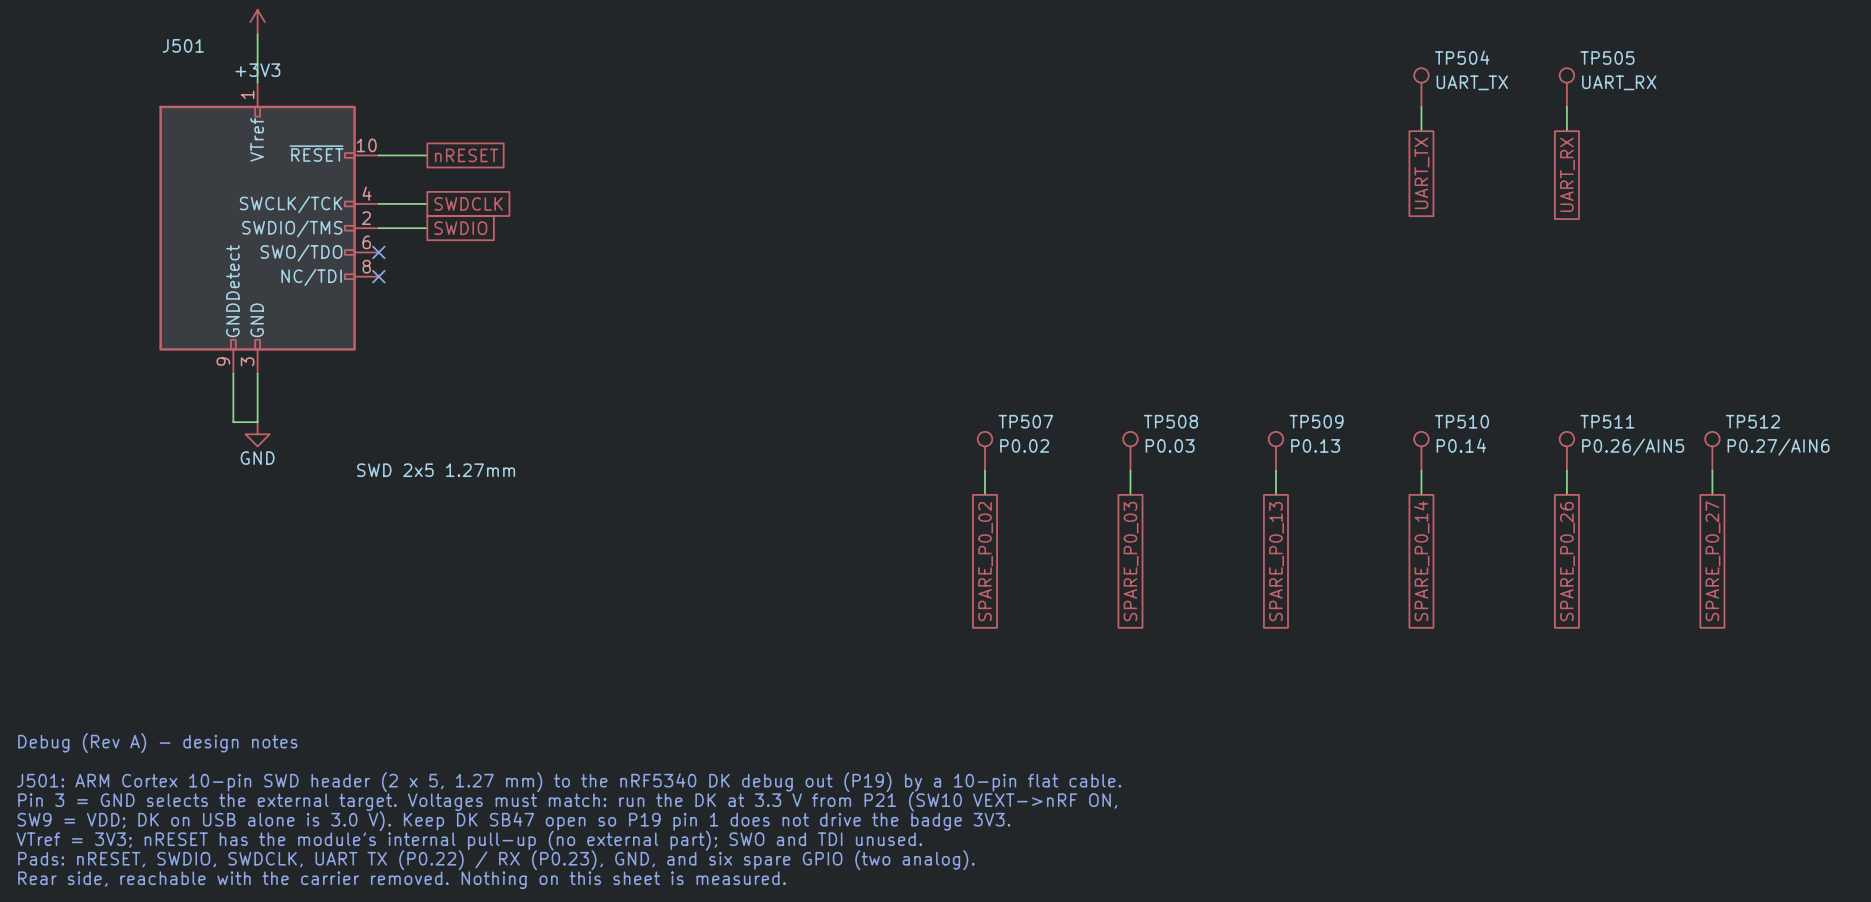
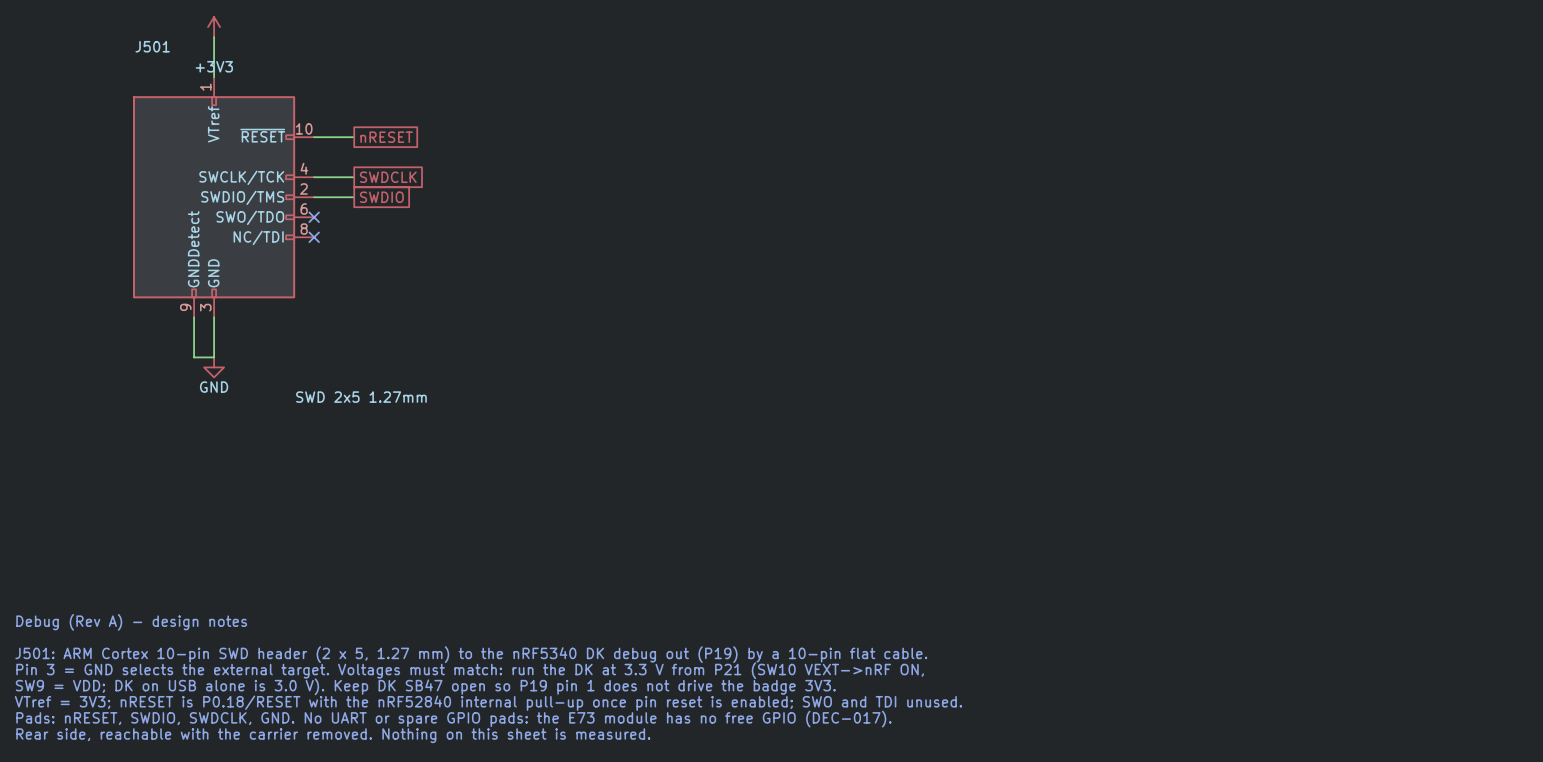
TP504: UART_TX (1421, 87) -> none
TP505: UART_RX (1566, 87) -> none
wire: (1421, 106) (1421, 131) -> none
wire: (1566, 106) (1566, 131) -> none
global label: UART_TX (1422, 173) -> none
global label: UART_RX (1567, 174) -> none
TP507: P0.02 (985, 451) -> none
TP508: P0.03 (1130, 451) -> none
TP509: P0.13 (1275, 451) -> none
TP510: P0.14 (1421, 451) -> none
TP511: P0.26/AIN5 (1566, 451) -> none
TP512: P0.27/AIN6 (1712, 451) -> none
wire: (985, 470) (985, 494) -> none
wire: (1130, 470) (1130, 494) -> none
wire: (1275, 470) (1275, 494) -> none
wire: (1421, 470) (1421, 494) -> none
wire: (1566, 470) (1566, 494) -> none
wire: (1712, 470) (1712, 494) -> none
global label: SPARE_P0_02 (985, 561) -> none
global label: SPARE_P0_03 (1131, 561) -> none
global label: SPARE_P0_13 (1276, 561) -> none
global label: SPARE_P0_14 (1421, 561) -> none
global label: SPARE_P0_26 (1567, 561) -> none
global label: SPARE_P0_27 (1712, 561) -> none
text: VTref = 3V3; nRESET has the module's internal pull-up (no external part); SWO and TDI unused. (469, 840) -> VTref = 3V3; nRESET is P0.18/RESET with the nRF52840 internal pull-up once pin reset is enabled; SWO and TDI unused. (488, 703)
text: Pads: nRESET, SWDIO, SWDCLK, UART TX (P0.22) / RX (P0.23), GND, and six spare GPIO (two analog). (496, 860) -> Pads: nRESET, SWDIO, SWDCLK, GND. No UART or spare GPIO pads: the E73 module has no free GPIO (DEC-017). (453, 719)

